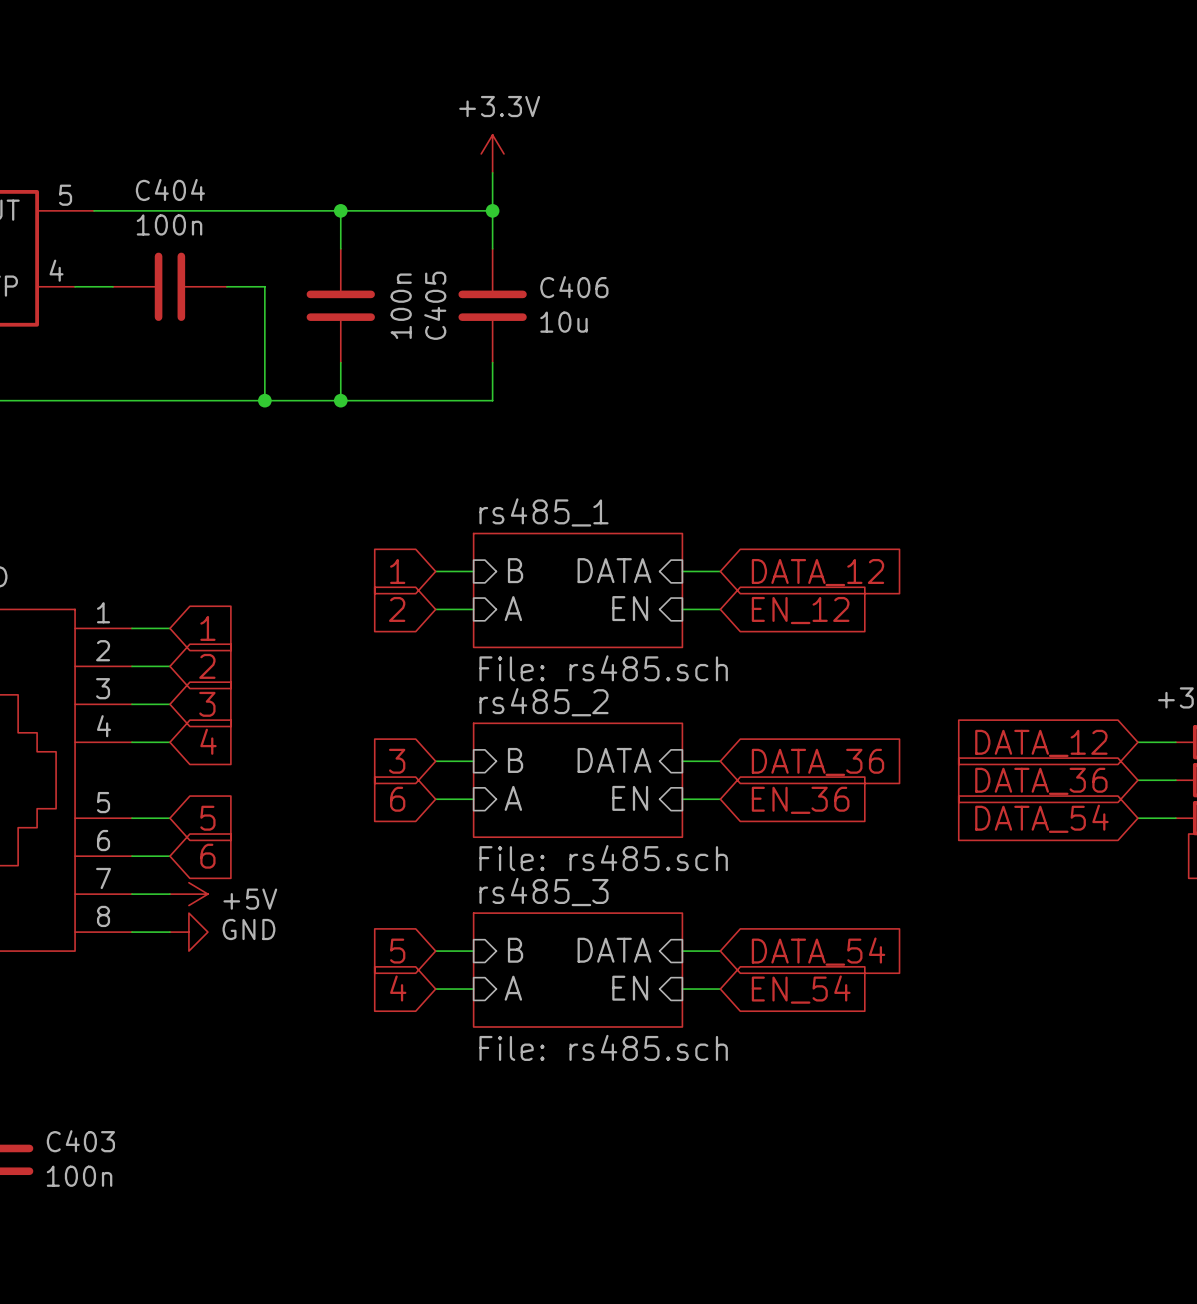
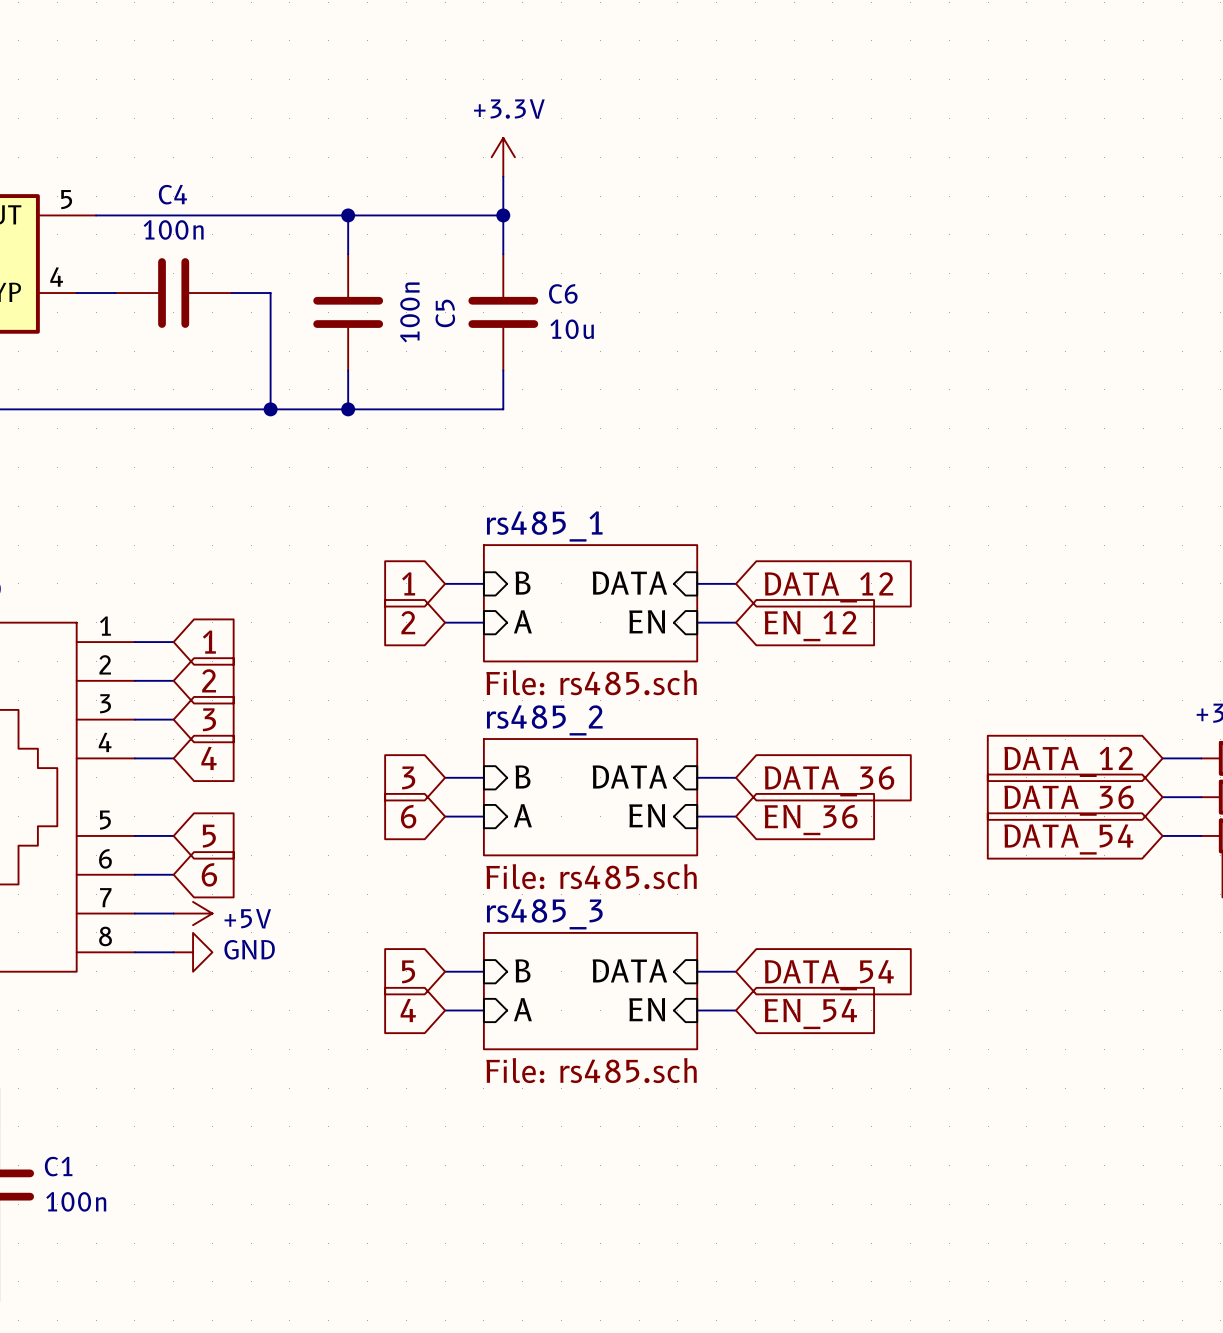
C404 name: C404 (170, 189) -> C4 (172, 194)
C406 name: C406 (574, 287) -> C6 (563, 293)
C405 name: C405 (435, 305) -> C5 (445, 313)
C403 name: C403 (80, 1141) -> C1 (58, 1166)

